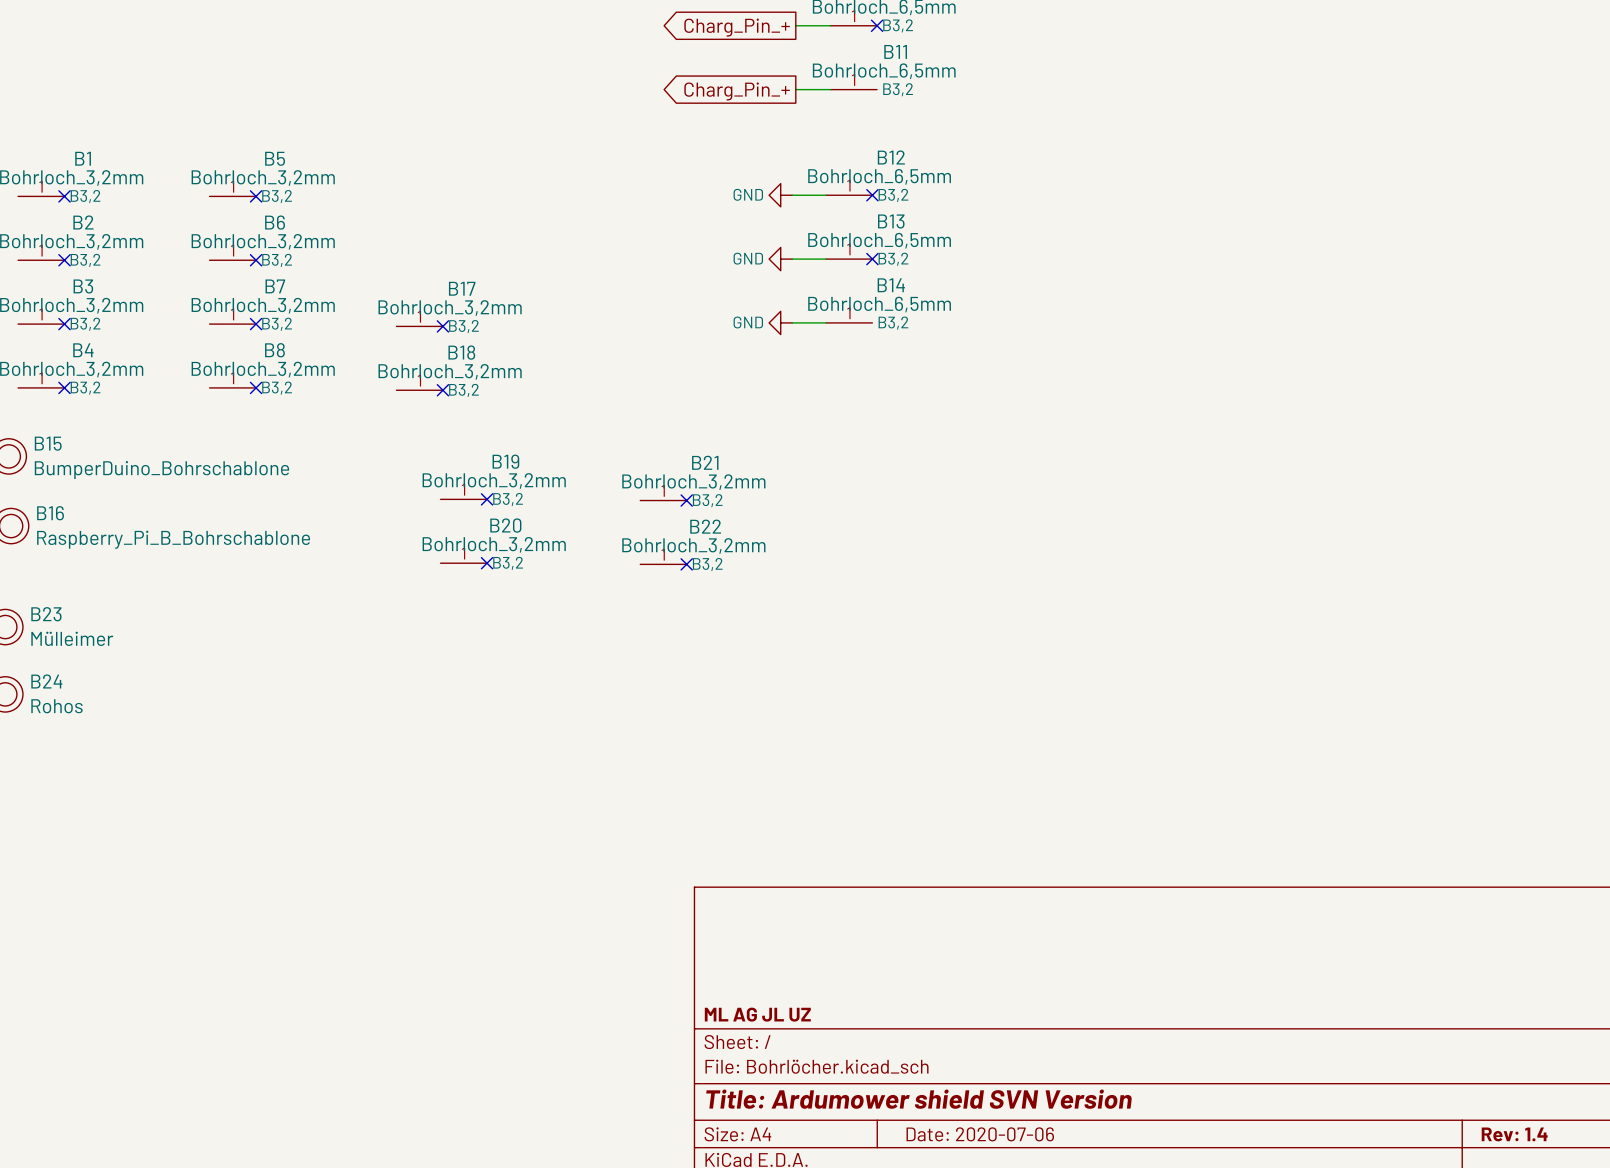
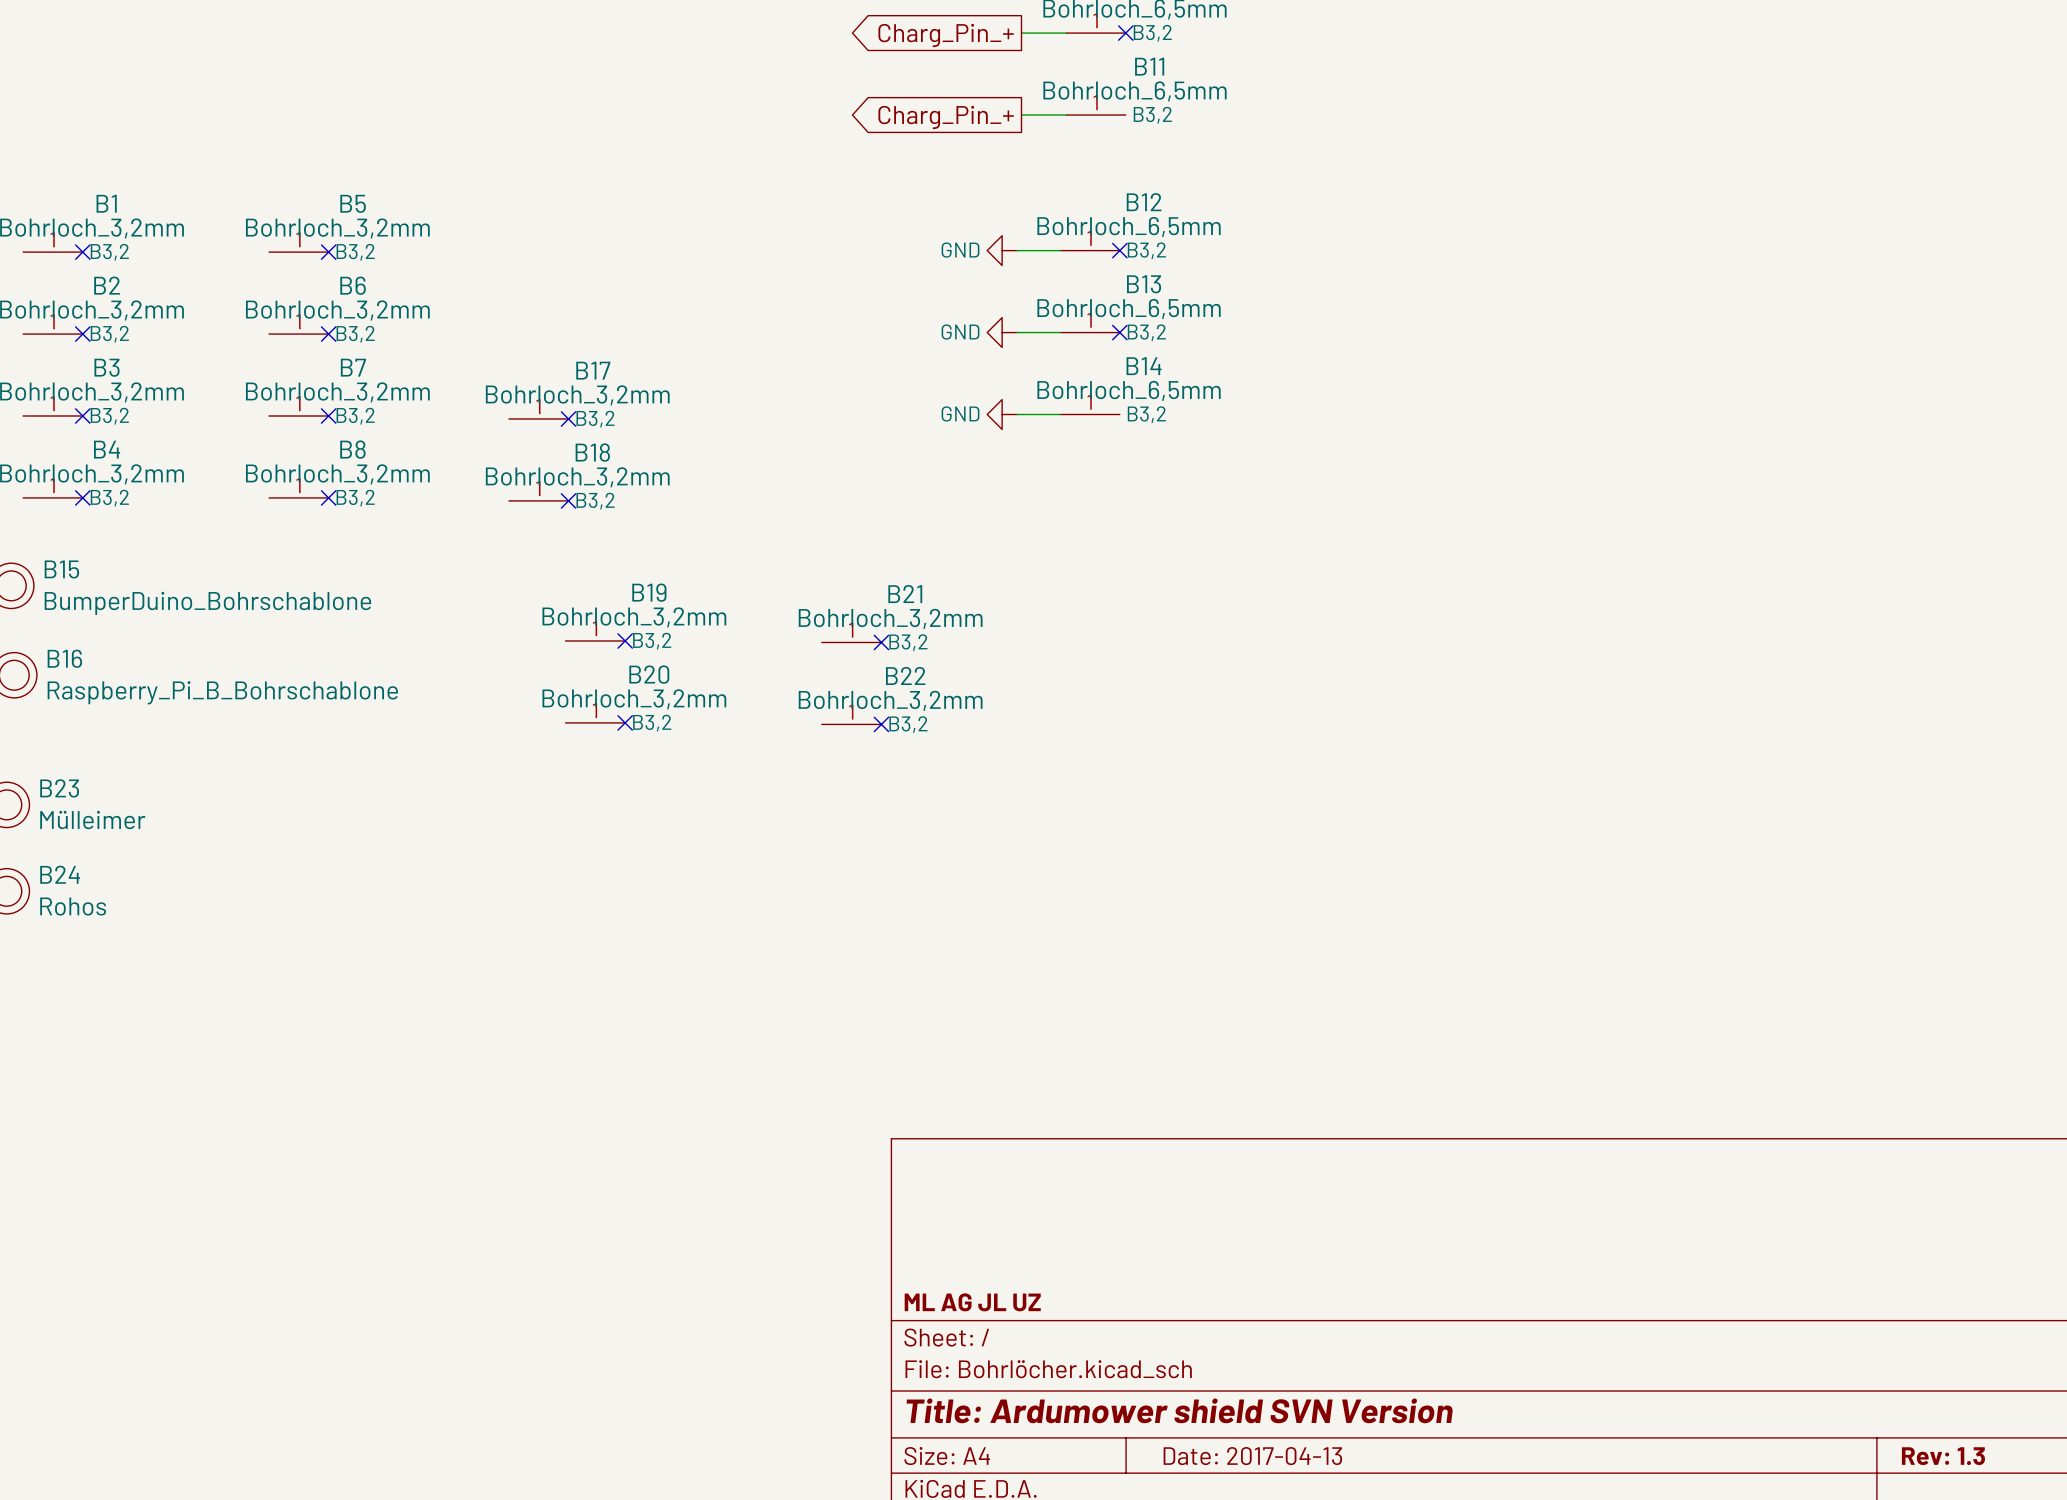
title block: Date: 2020-07-06 (980, 1134) -> Date: 2017-04-13 (1252, 1456)
title block: Rev: 1.4 (1514, 1134) -> Rev: 1.3 (1943, 1456)

